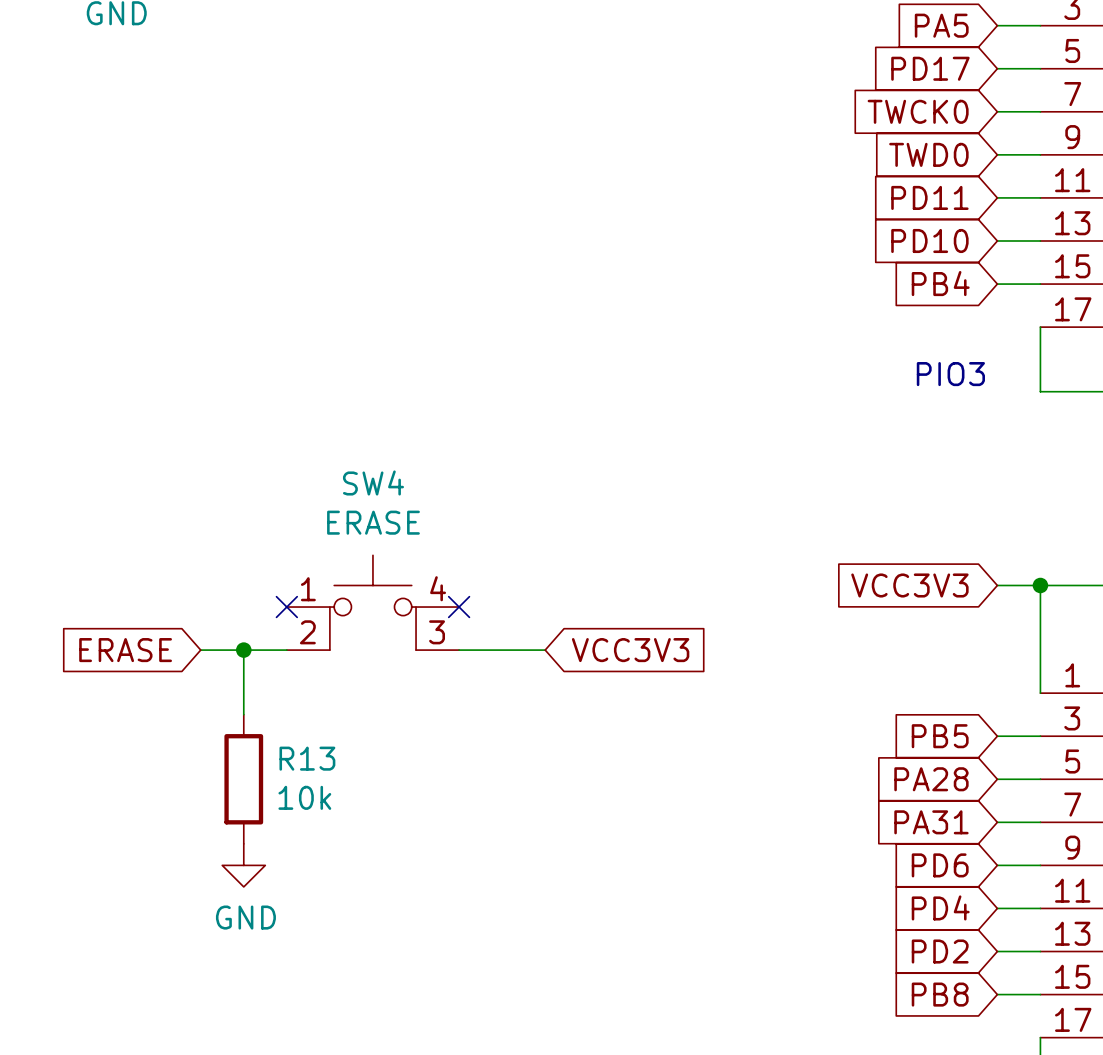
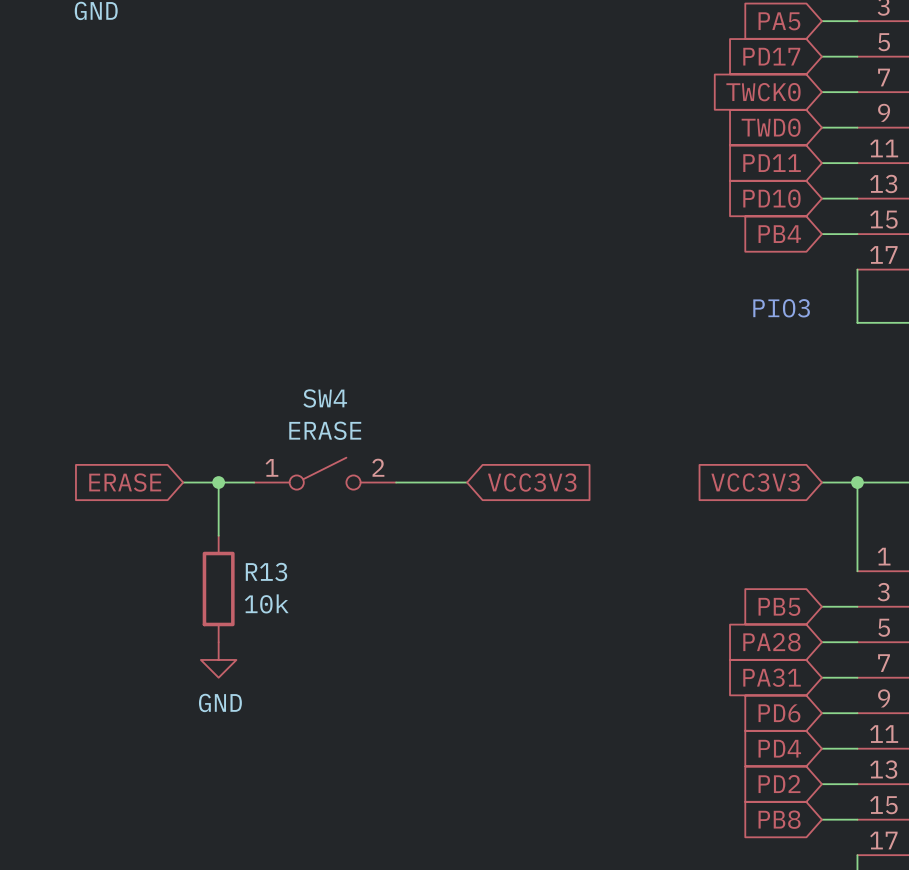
SW4 symbol: [286, 555, 460, 651] -> [254, 457, 397, 490]
no-connect mark: (286, 607) -> none
no-connect mark: (459, 607) -> none
global label position: ERASE (125, 650) -> ERASE (125, 482)
wire: (200, 650) (286, 650) -> (183, 482) (254, 482)
wire: (243, 650) (243, 714) -> (218, 482) (218, 535)
junction position: (243, 650) -> (218, 482)
wire: (459, 650) (545, 650) -> (396, 482) (467, 482)
global label position: VCC3V3 (630, 650) -> VCC3V3 (532, 482)
R13 position: (243, 779) -> (218, 588)
power symbol position: GND (243, 865) -> GND (218, 659)

